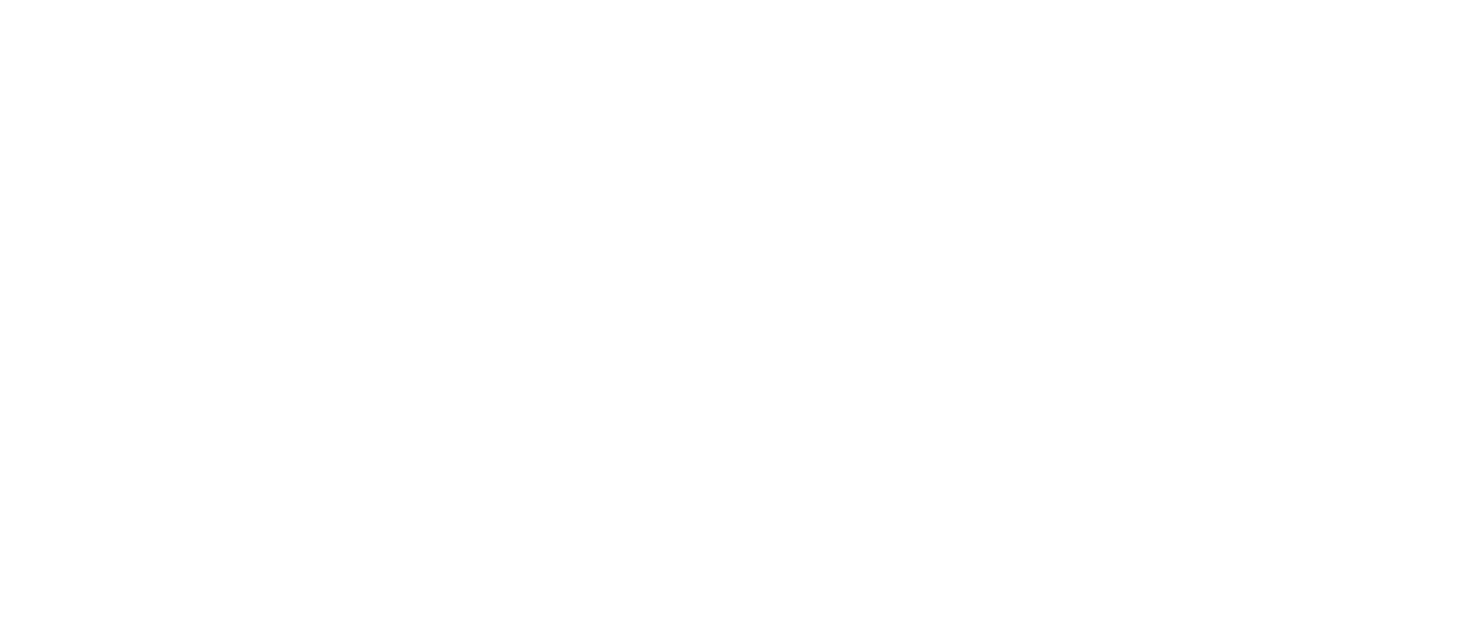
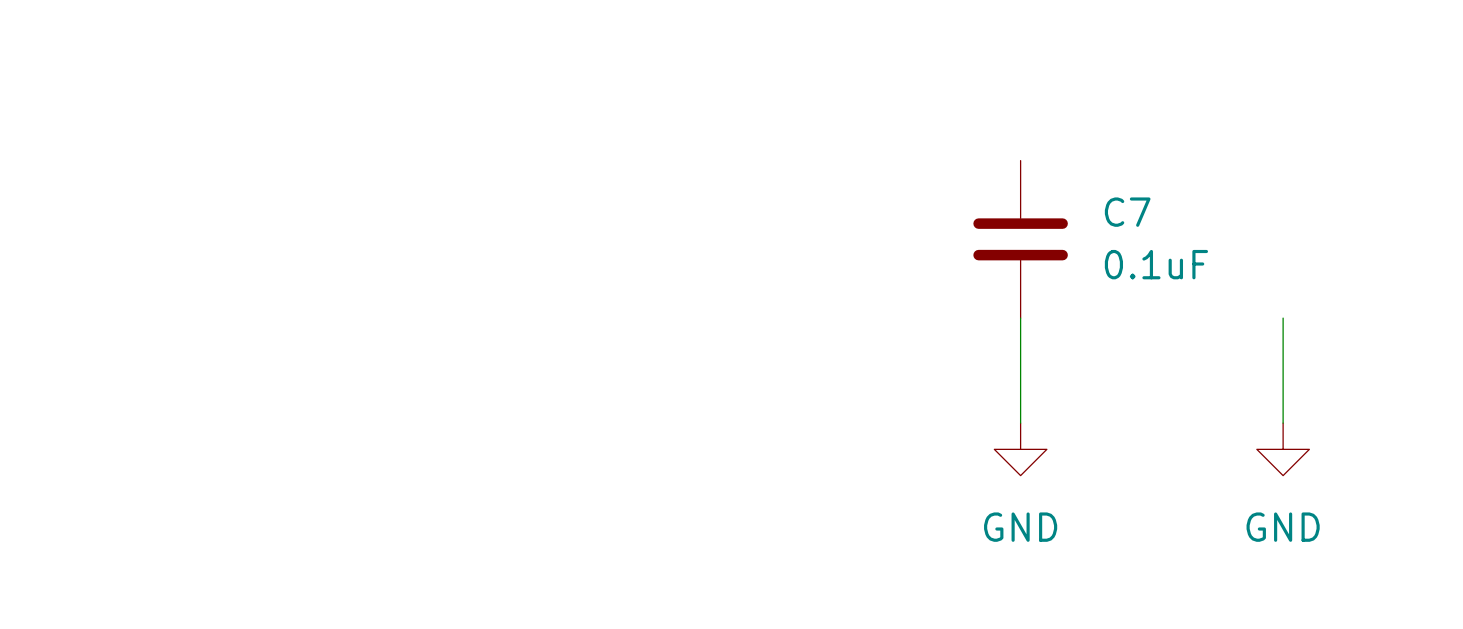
C7: none -> 0.1uF (1020, 239)
wire: none -> (1020, 318) (1020, 423)
wire: none -> (1283, 318) (1283, 423)
power symbol: none -> GND (1020, 449)
power symbol: none -> GND (1283, 449)

